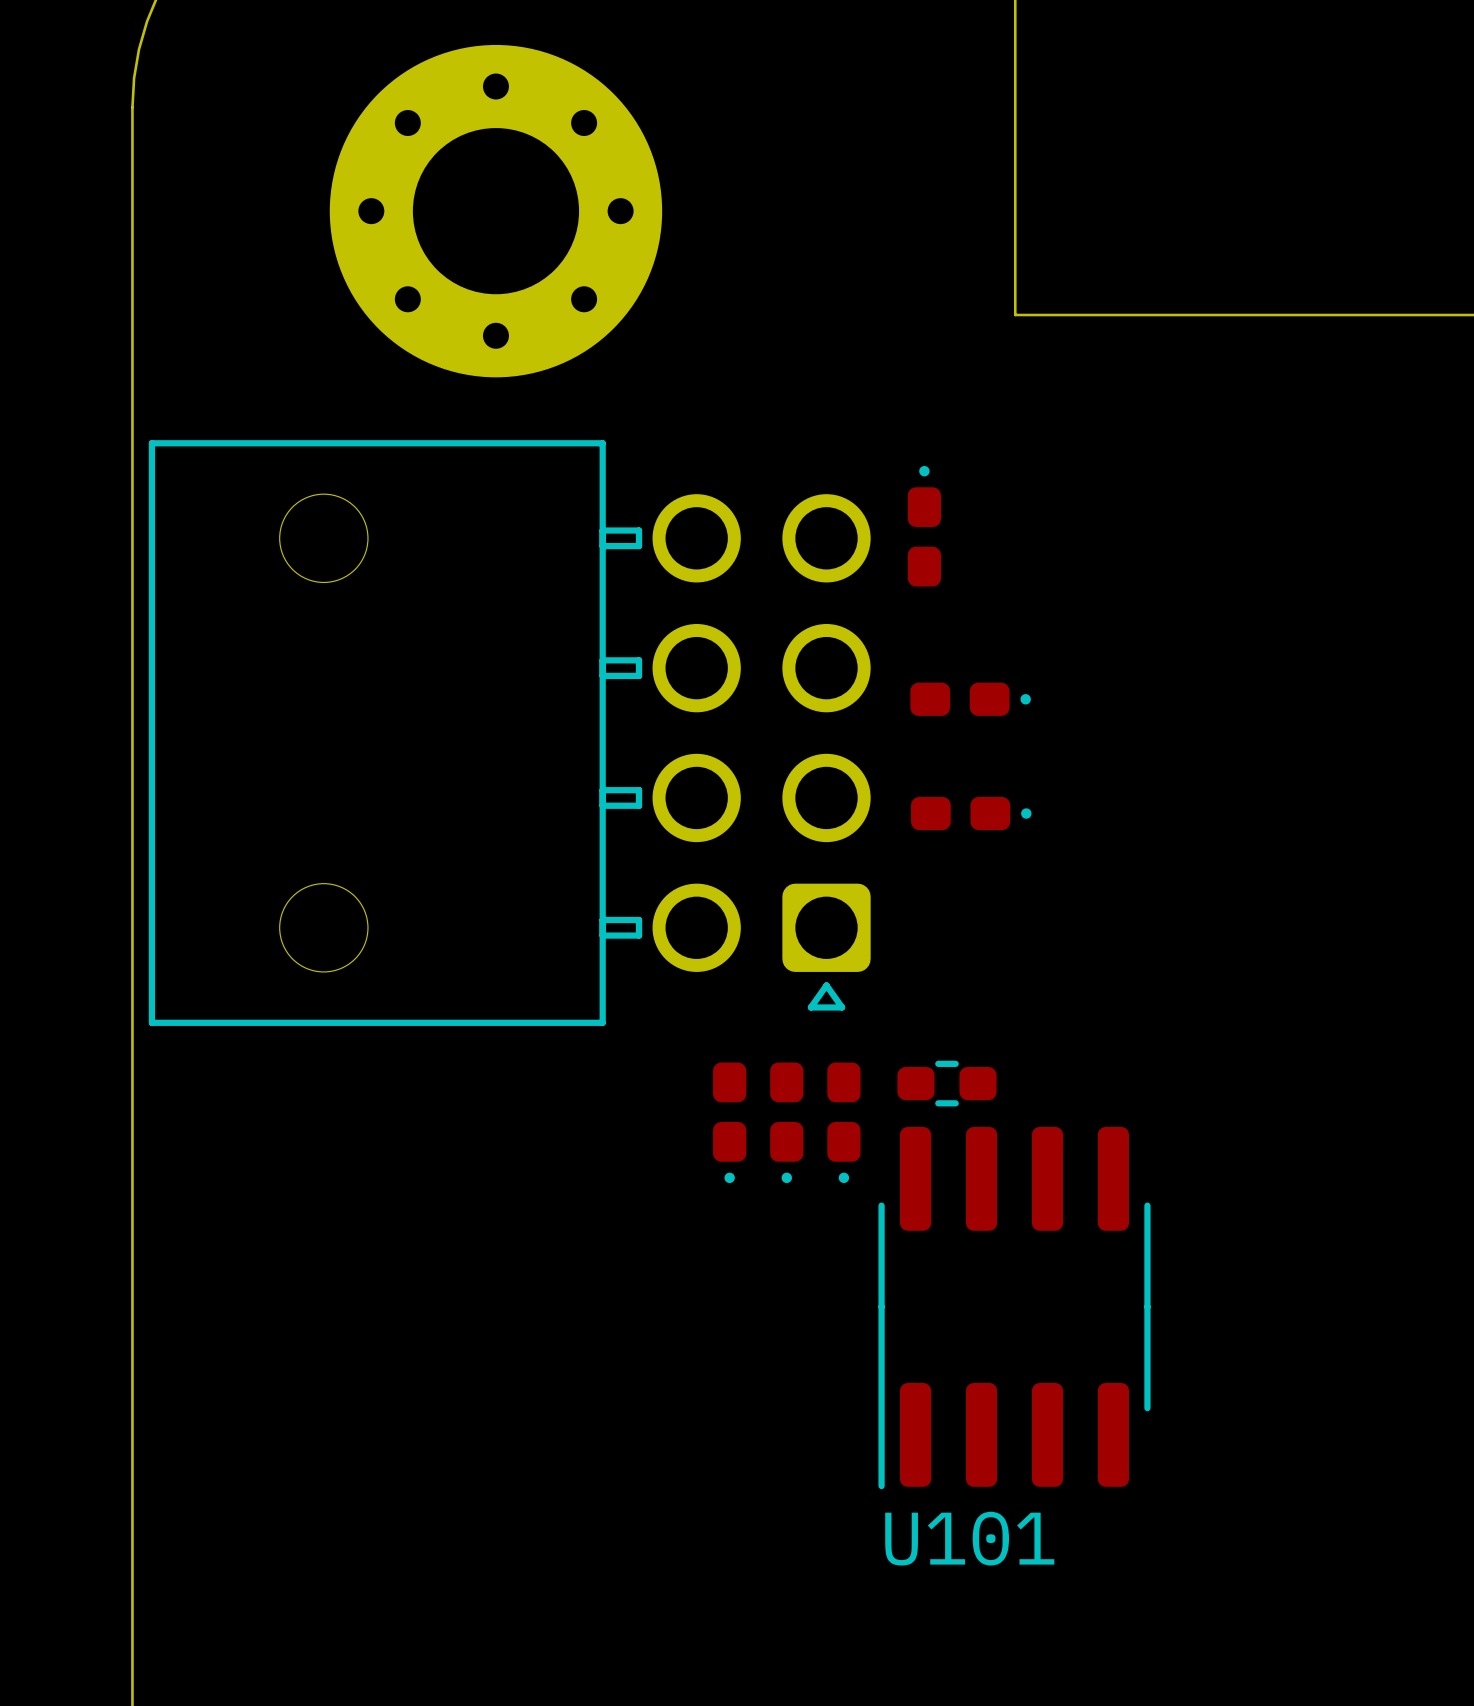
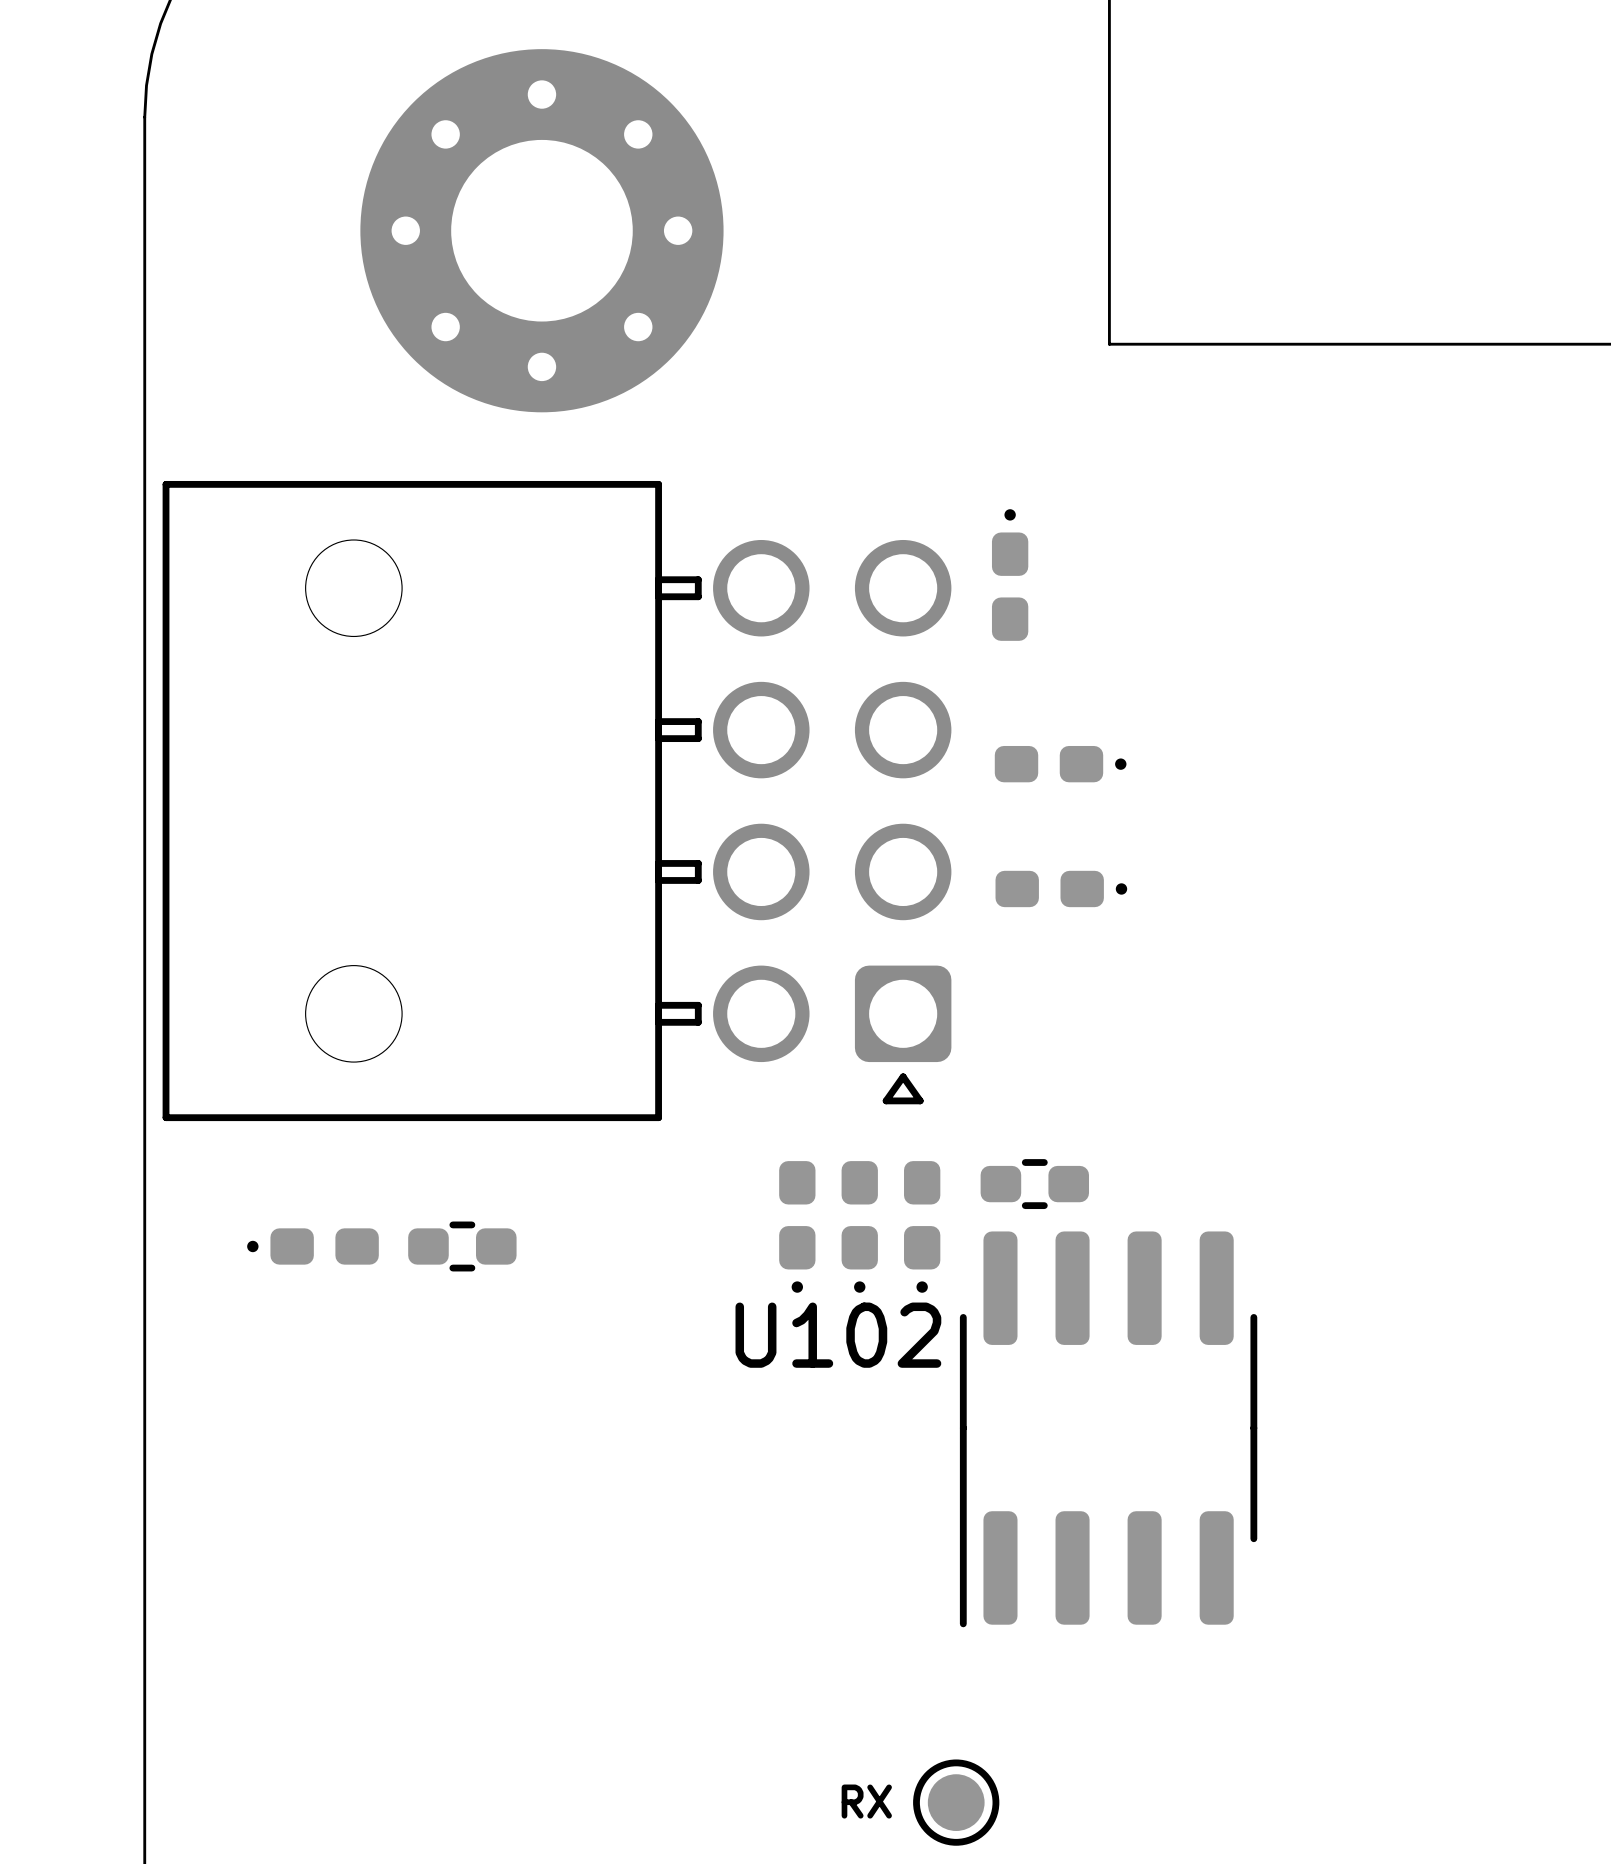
part: none -> (312, 1246)
part: none -> (462, 1246)
U101 name: U101 (969, 1538) -> U102 (838, 1335)
RX: none -> (956, 1802)

